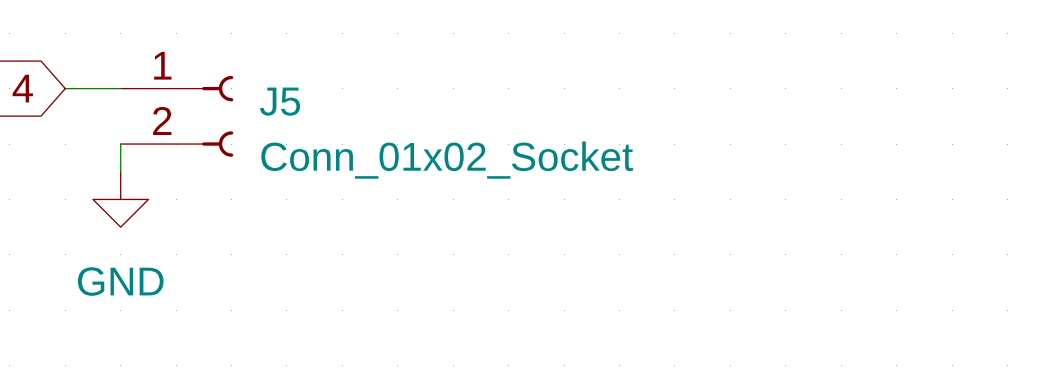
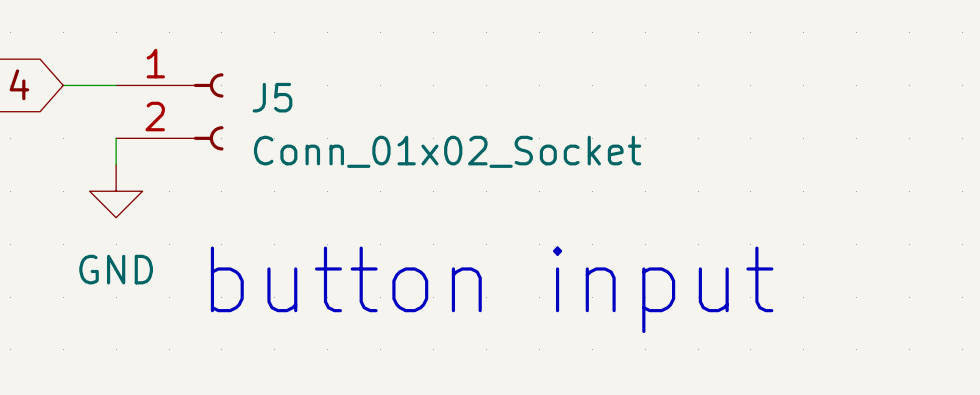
text: none -> button input (492, 289)

